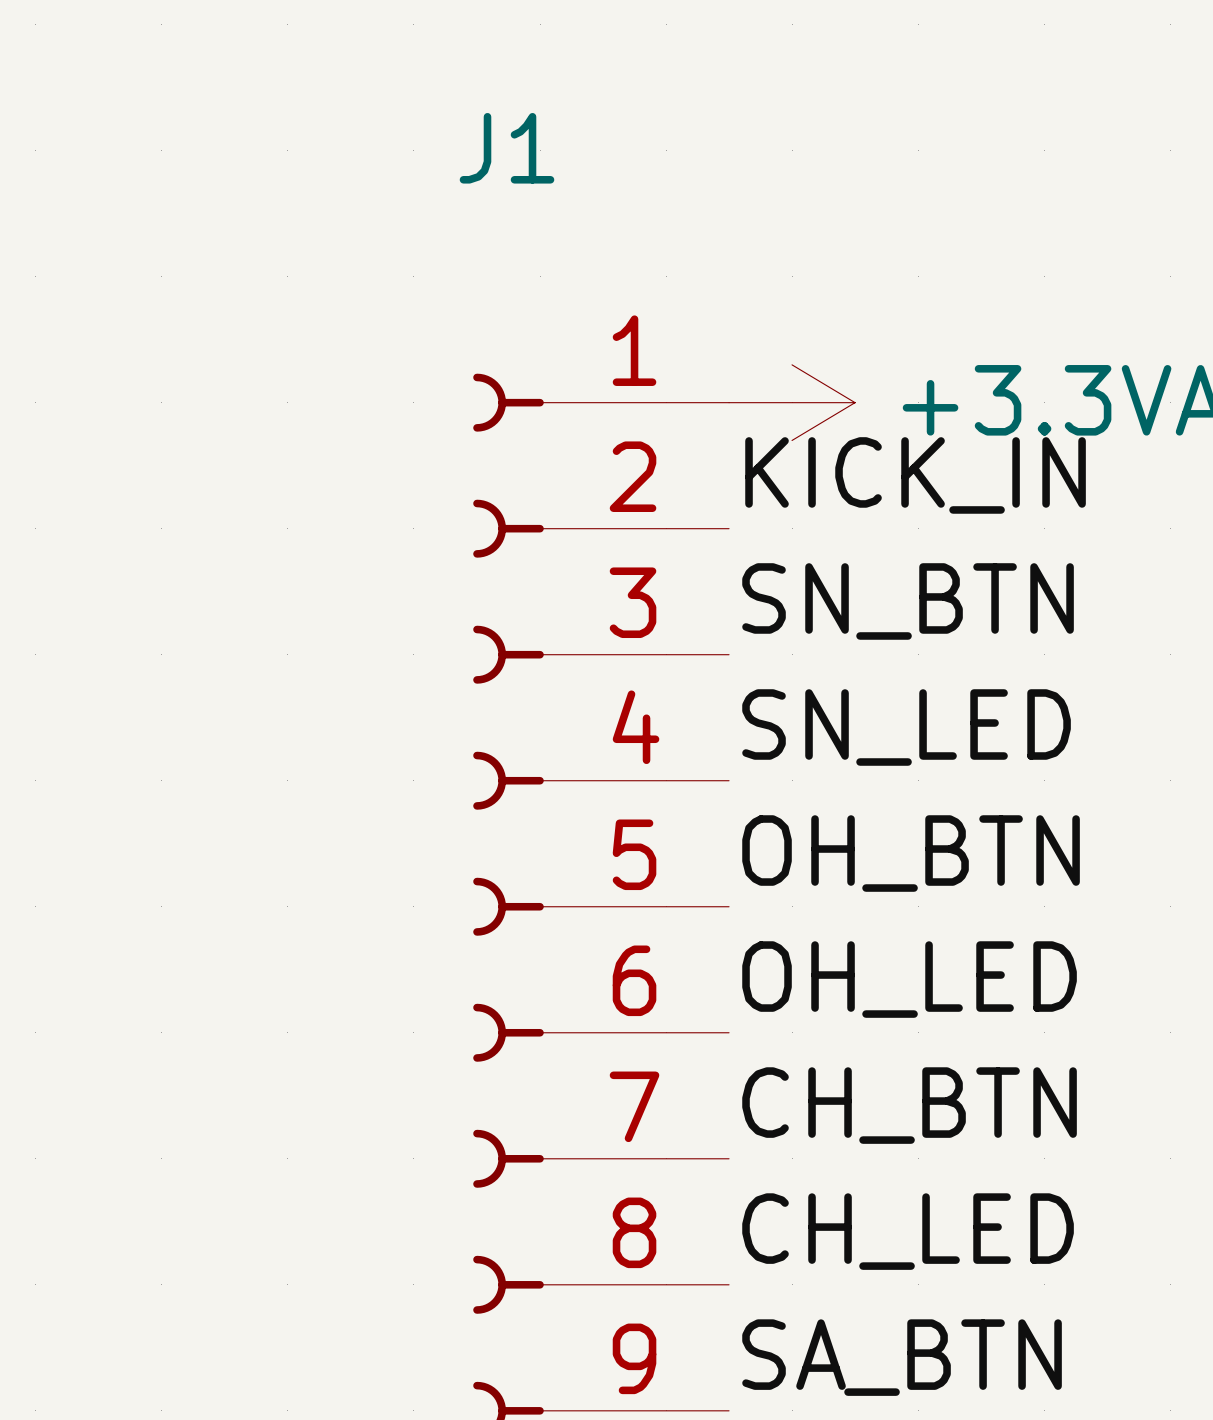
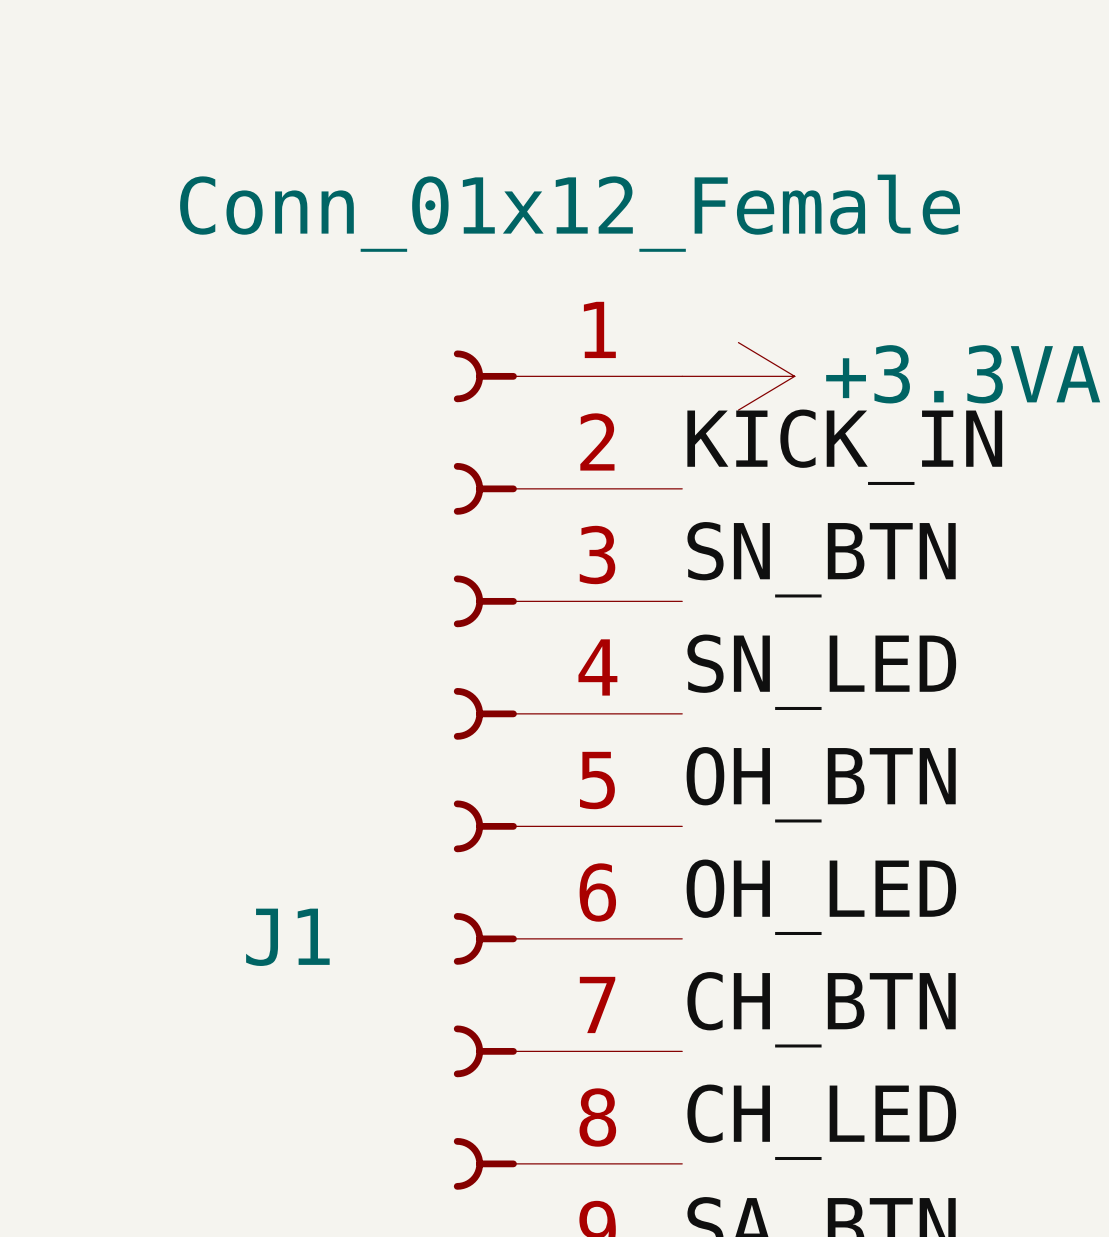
J1 name position: J1 (507, 148) -> J1 (287, 937)
J1 value: none -> Conn_01x12_Female (570, 213)

